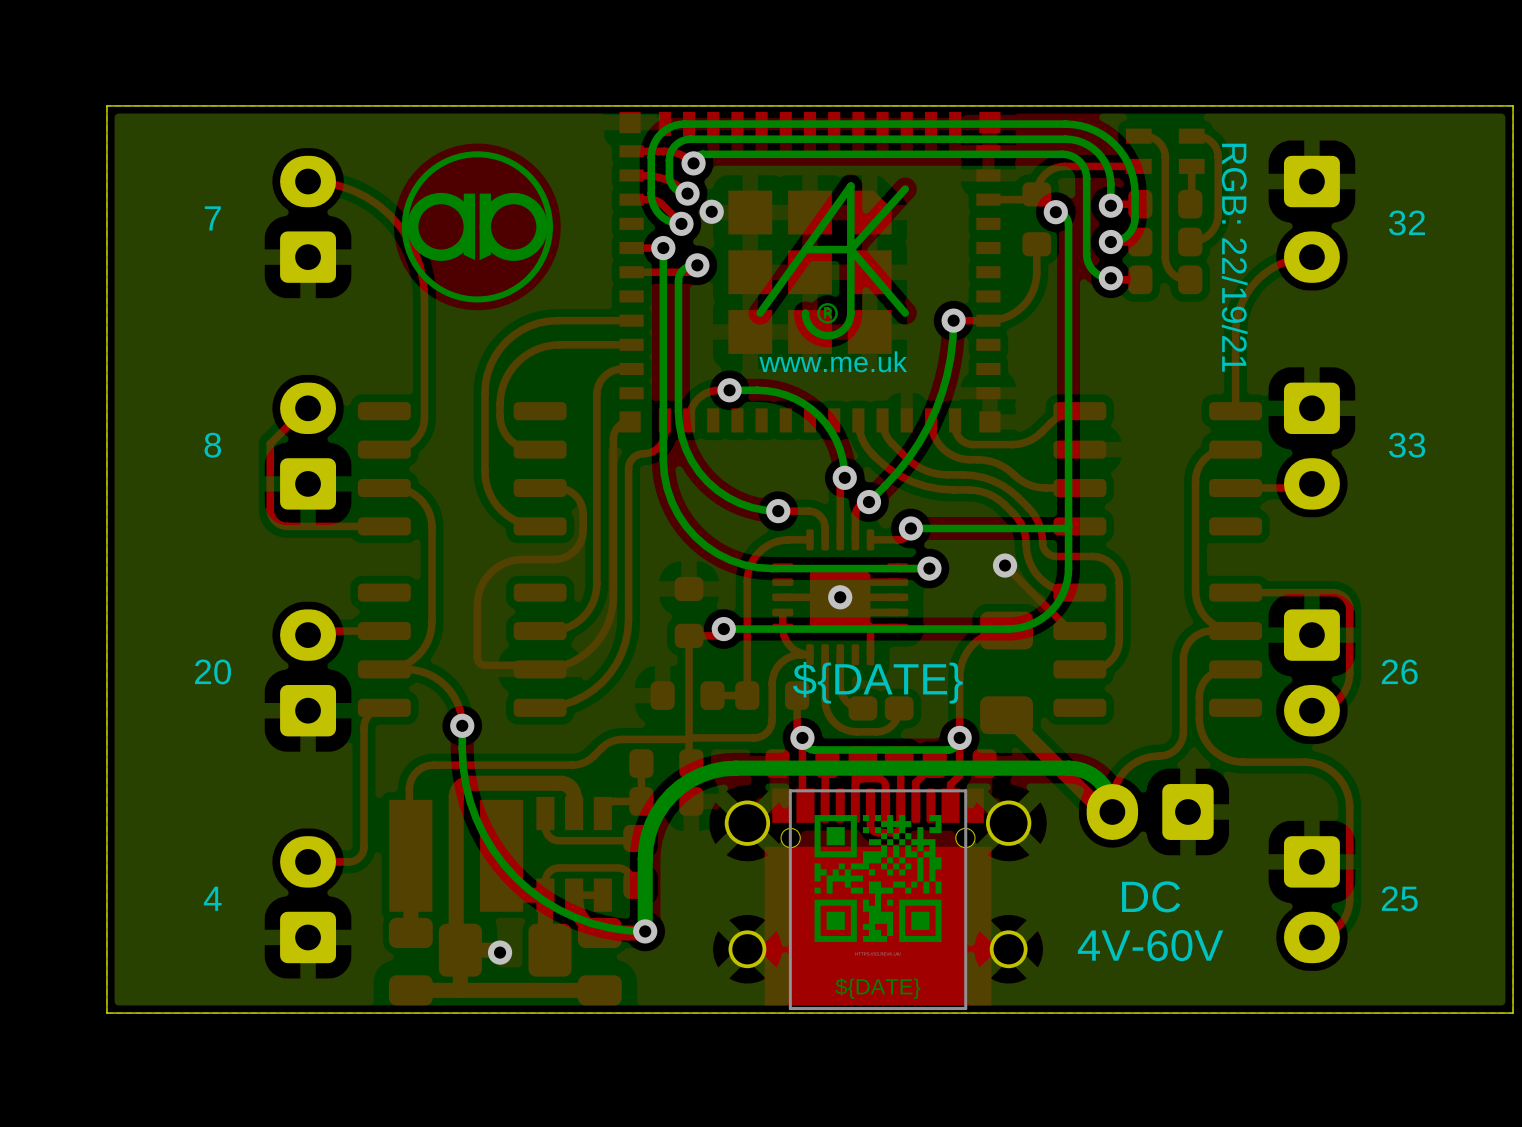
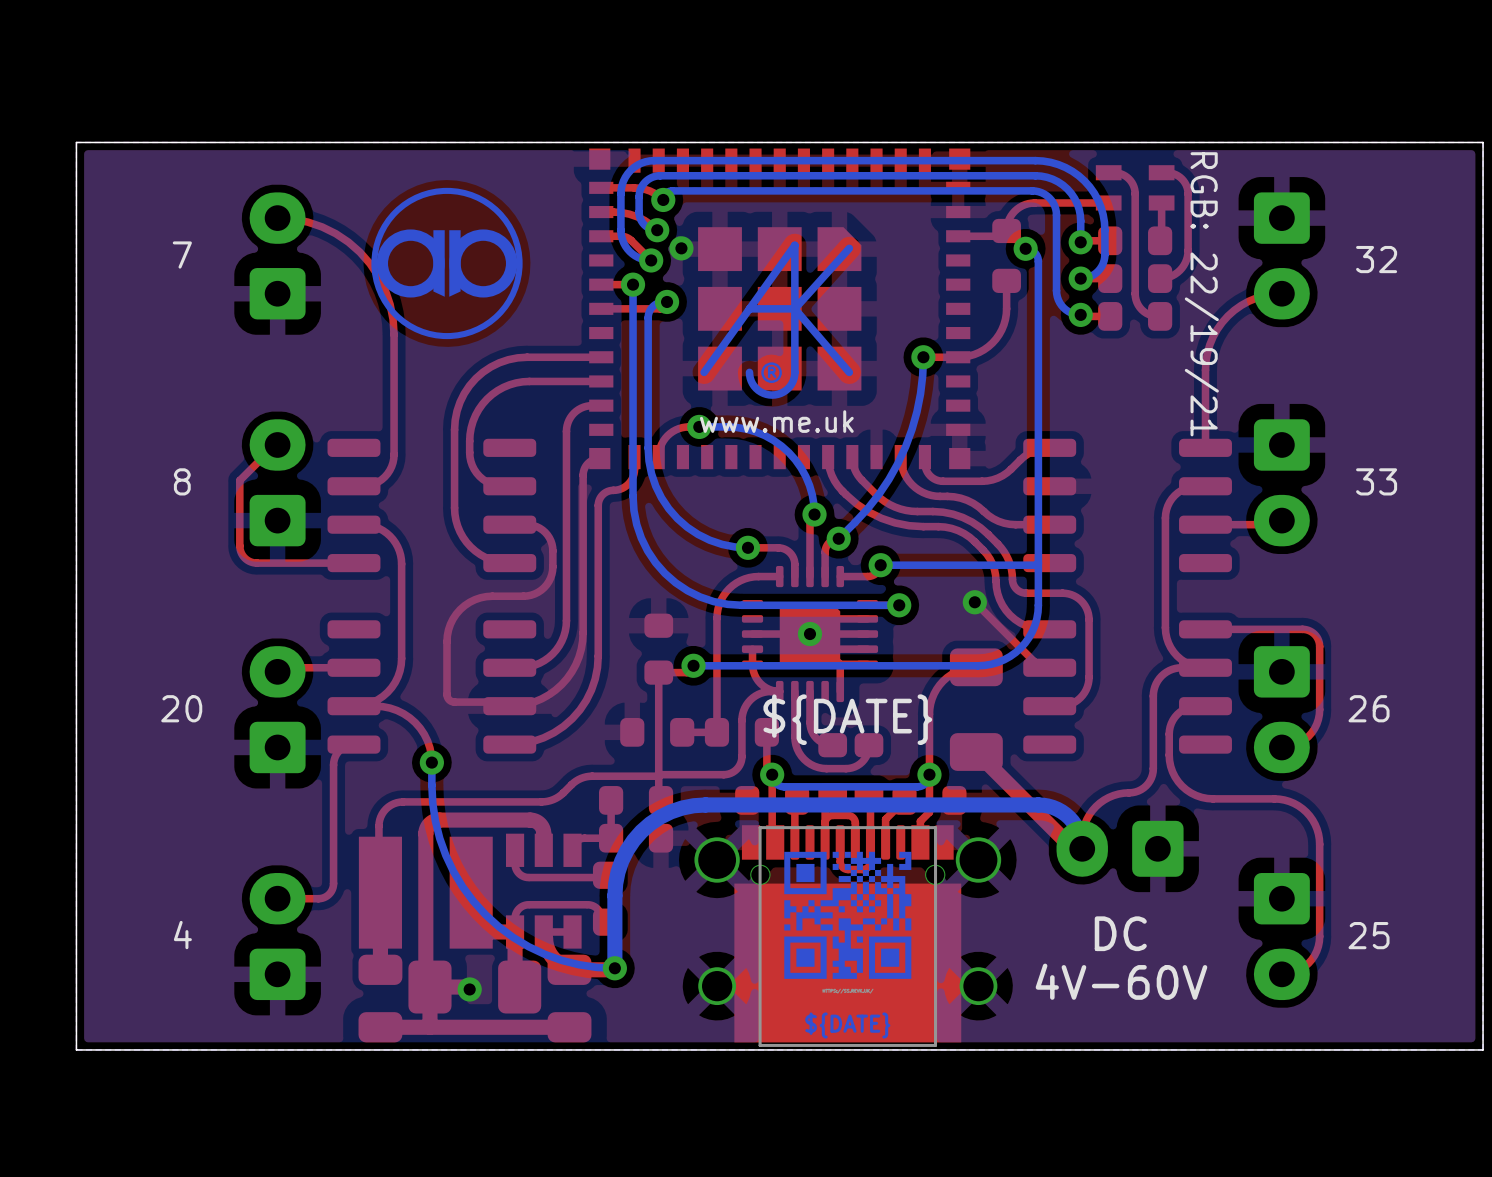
drawing position: (832, 260) -> (776, 320)

